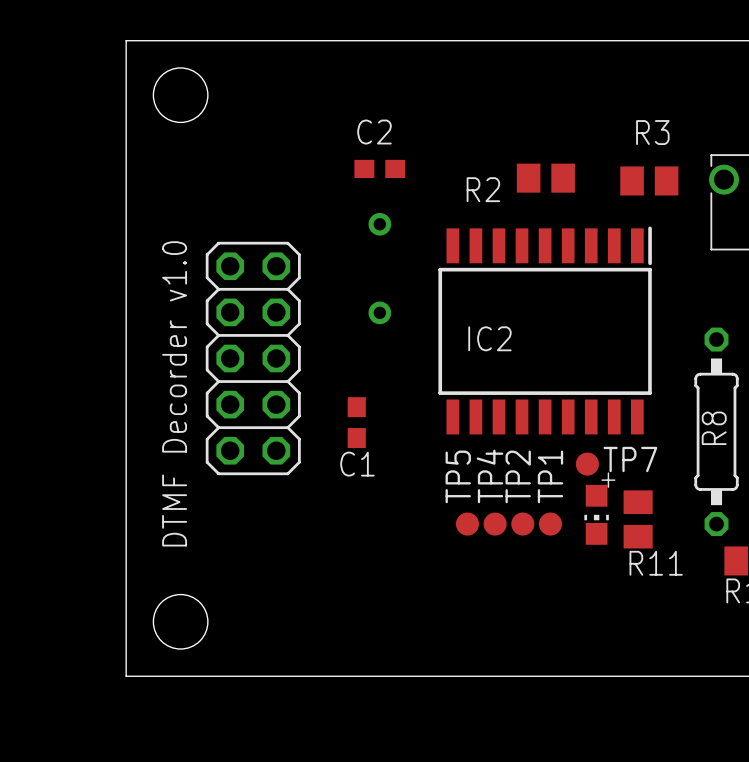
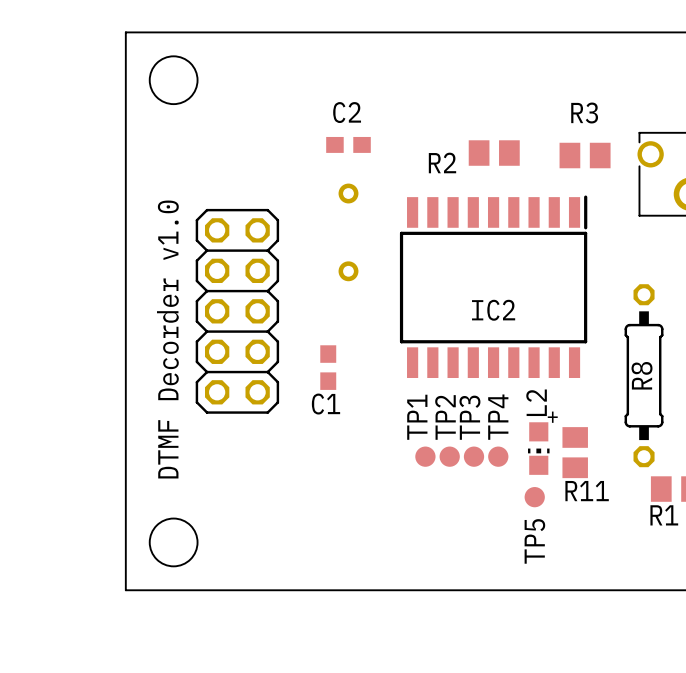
IC2 name position: IC2 (489, 338) -> IC2 (493, 310)
TP7: (587, 464) -> none
L2 name: none -> L2 (536, 402)
TP5 name: TP5 (458, 476) -> TP1 (417, 417)
TP4 name: TP4 (489, 476) -> TP2 (445, 417)
TP2 name: TP2 (518, 476) -> TP3 (469, 417)
TP1 name: TP1 (550, 476) -> TP4 (498, 417)
TP5: none -> (534, 497)

